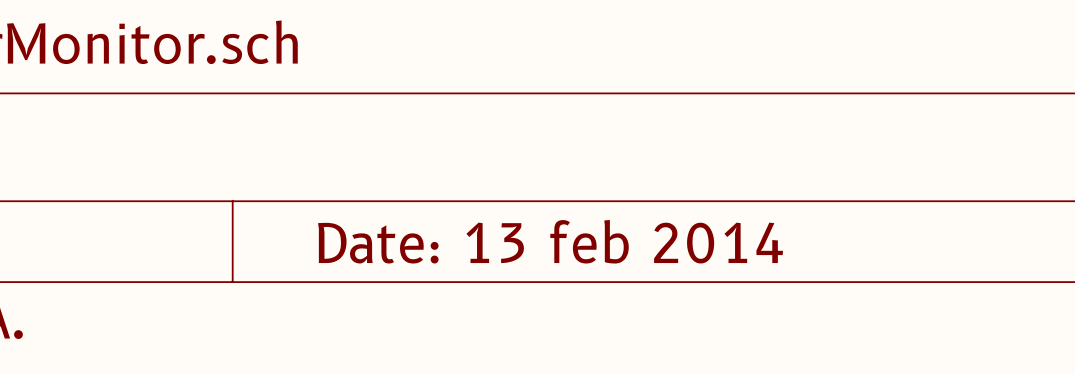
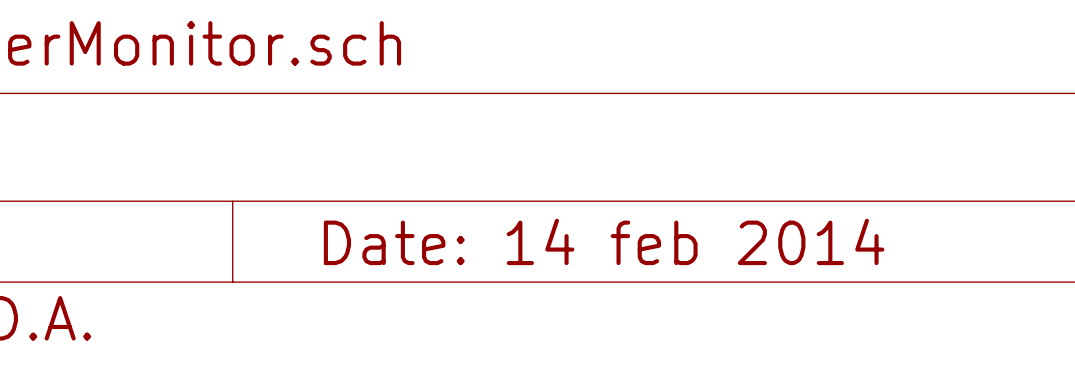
title block: Date: 13 feb 2014 (550, 241) -> Date: 14 feb 2014 (604, 241)

